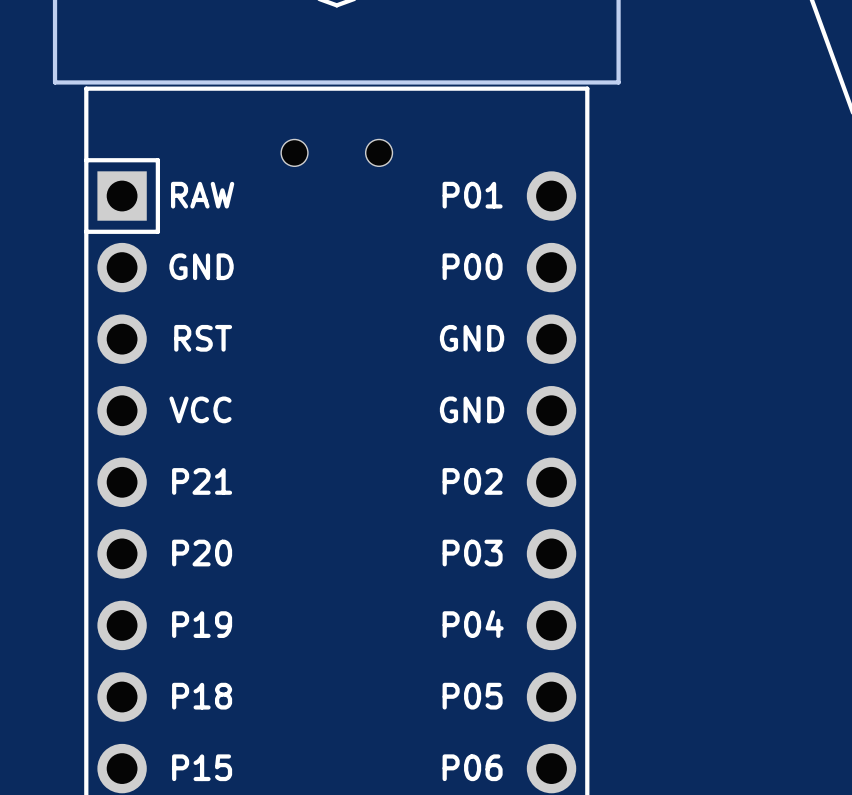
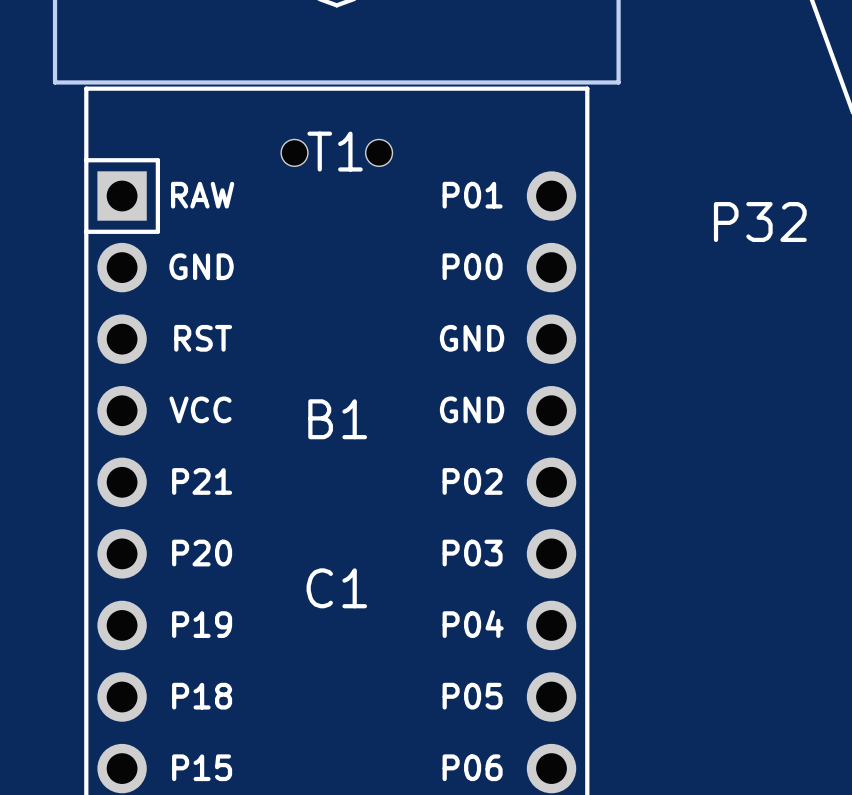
T1 name: none -> T1 (335, 151)
P32: none -> (760, 222)
B1: none -> (337, 419)
C1 name: none -> C1 (336, 588)

